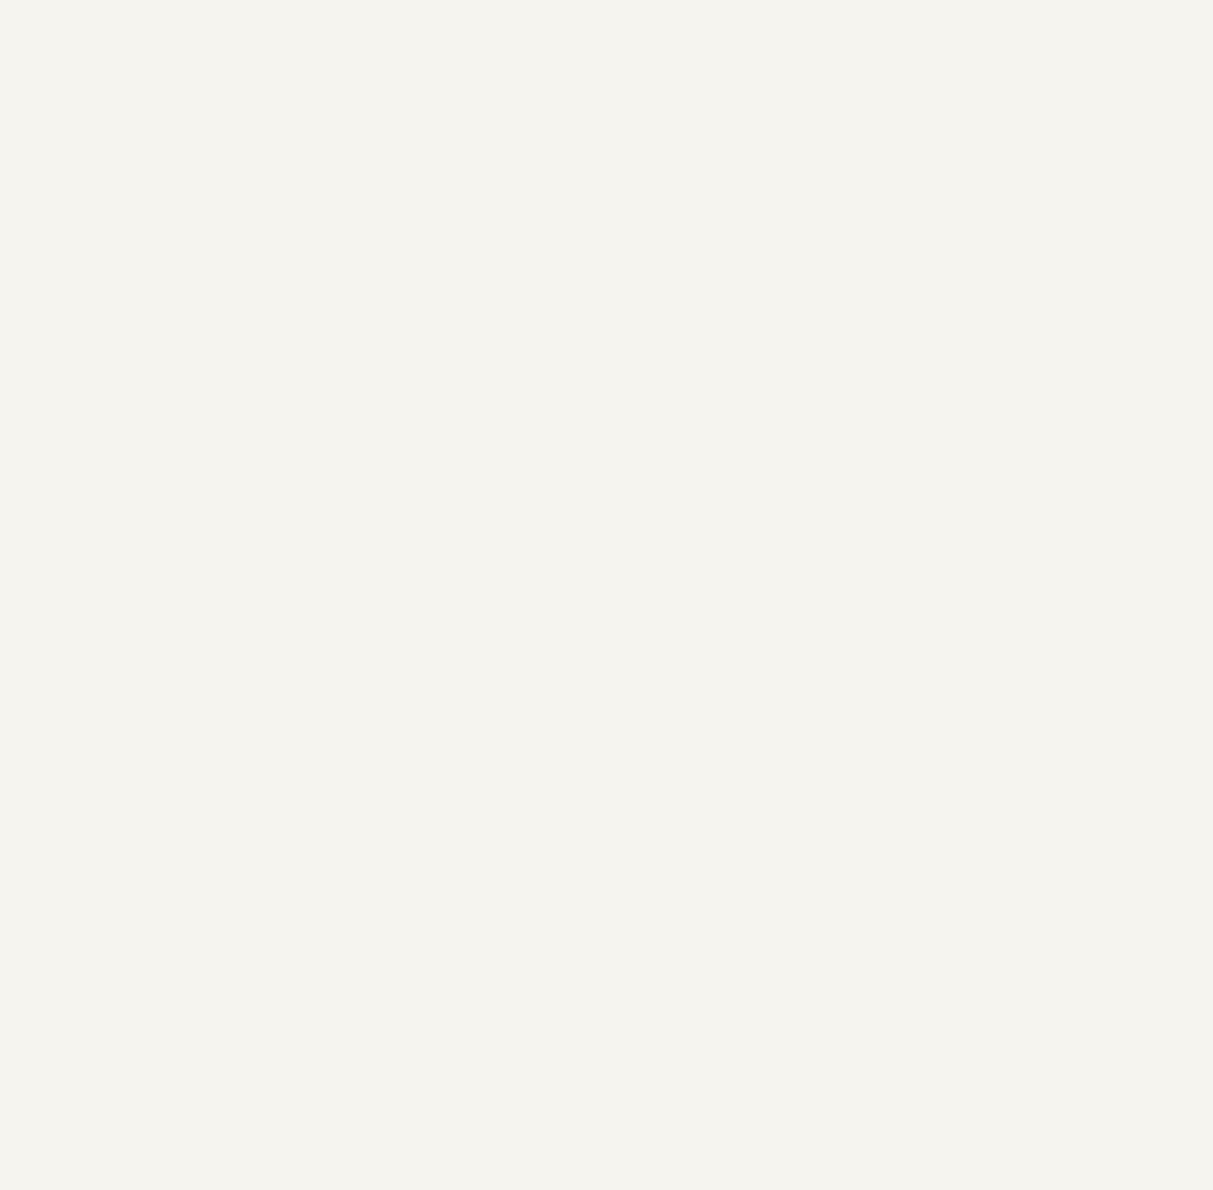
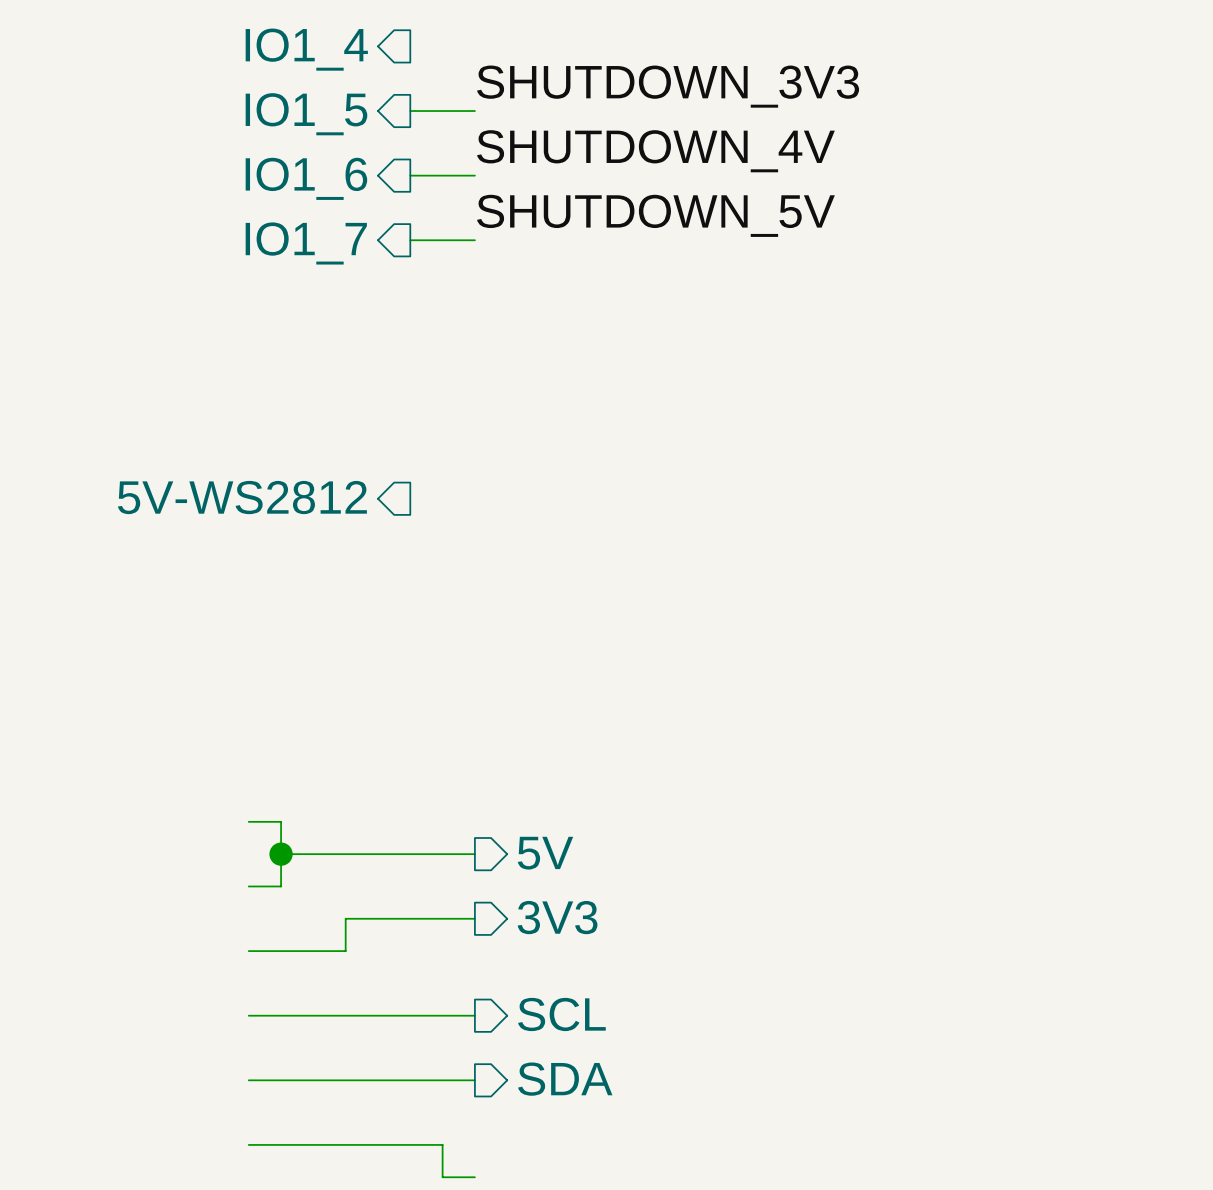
sheet pin: none -> IO1_4 (306, 49)
label: none -> SHUTDOWN_3V3 (668, 86)
wire: none -> (410, 111) (474, 111)
sheet pin: none -> IO1_5 (306, 114)
label: none -> SHUTDOWN_4V (655, 151)
wire: none -> (410, 175) (474, 175)
sheet pin: none -> IO1_6 (306, 178)
label: none -> SHUTDOWN_5V (655, 215)
wire: none -> (410, 240) (474, 240)
sheet pin: none -> IO1_7 (306, 243)
sheet pin: none -> 5V-WS2812 (242, 497)
wire: none -> (248, 821) (281, 821) (281, 886) (248, 886)
sheet pin: none -> 5V (545, 853)
wire: none -> (281, 854) (474, 854)
junction: none -> (281, 854)
sheet pin: none -> 3V3 (557, 917)
wire: none -> (474, 918) (345, 918) (345, 951) (248, 951)
sheet pin: none -> SCL (561, 1014)
wire: none -> (248, 1015) (474, 1015)
sheet pin: none -> SDA (565, 1079)
wire: none -> (248, 1080) (474, 1080)
wire: none -> (248, 1144) (442, 1144) (442, 1177) (474, 1177)

